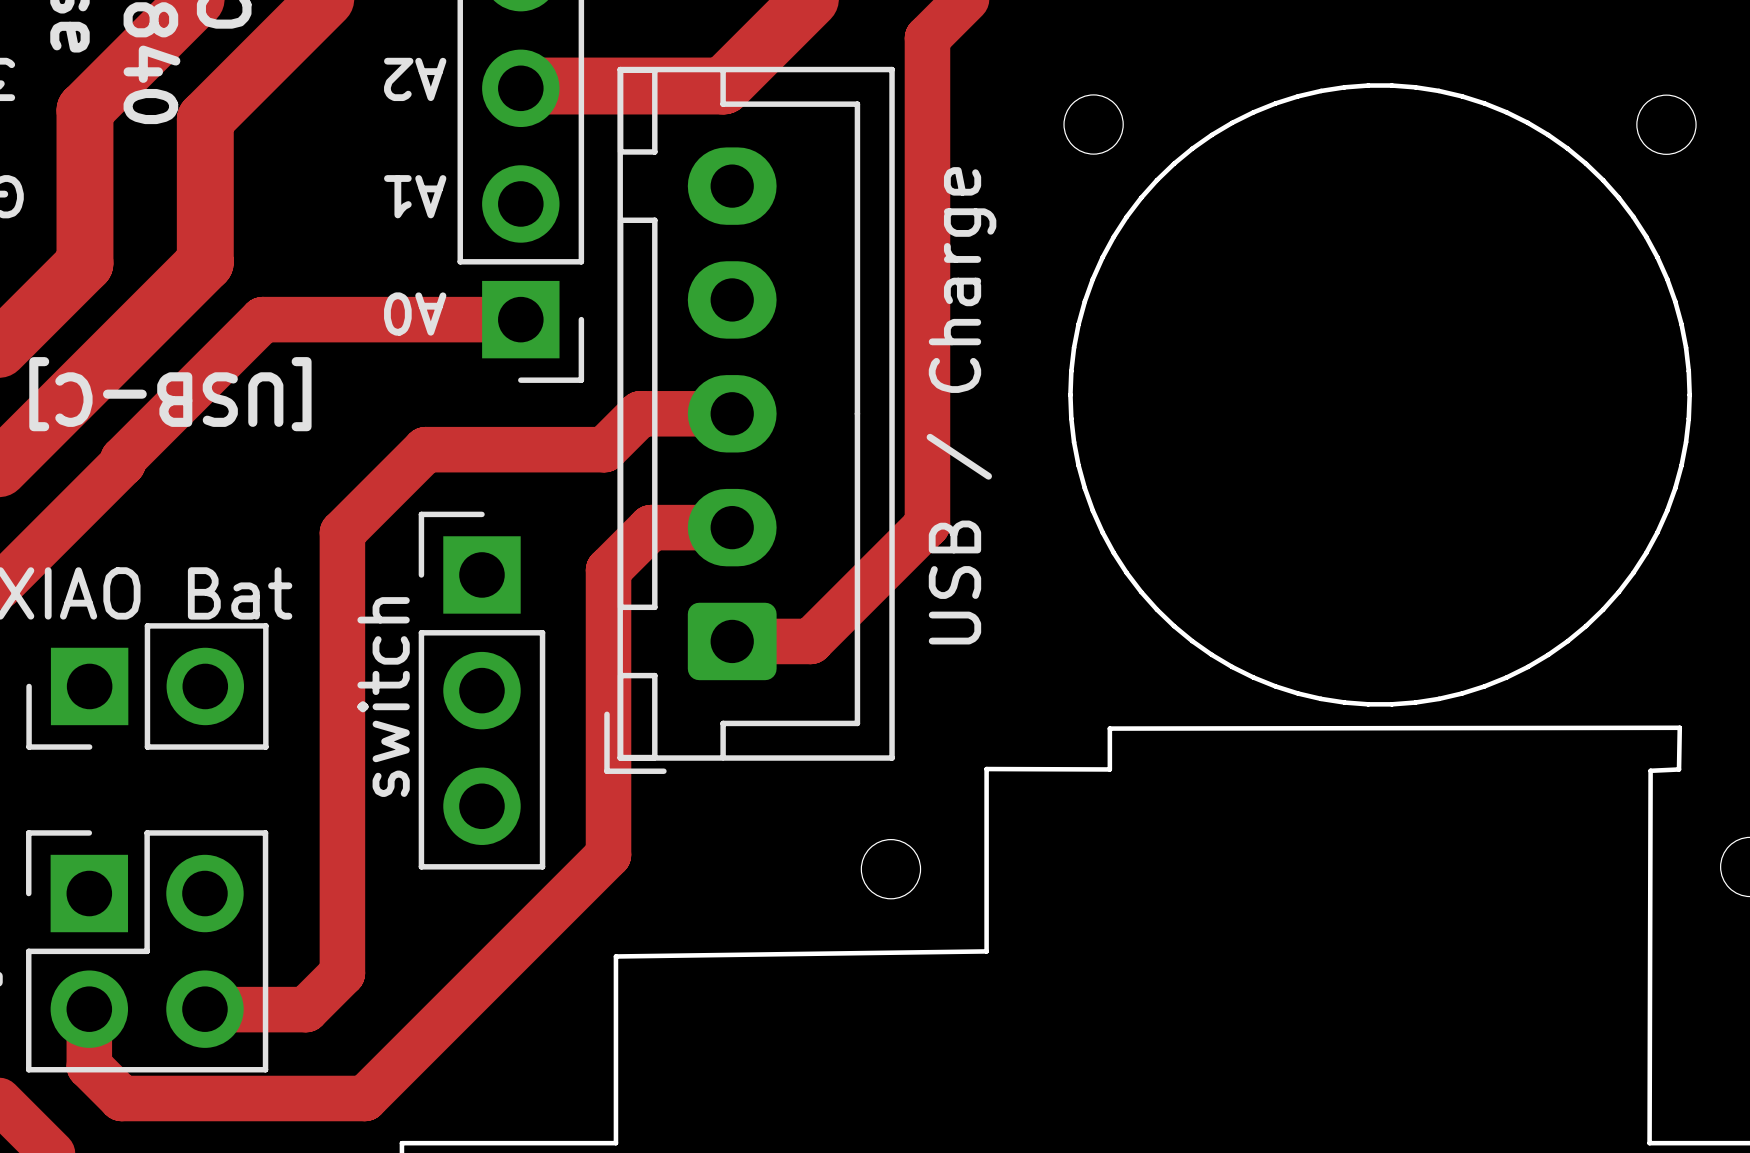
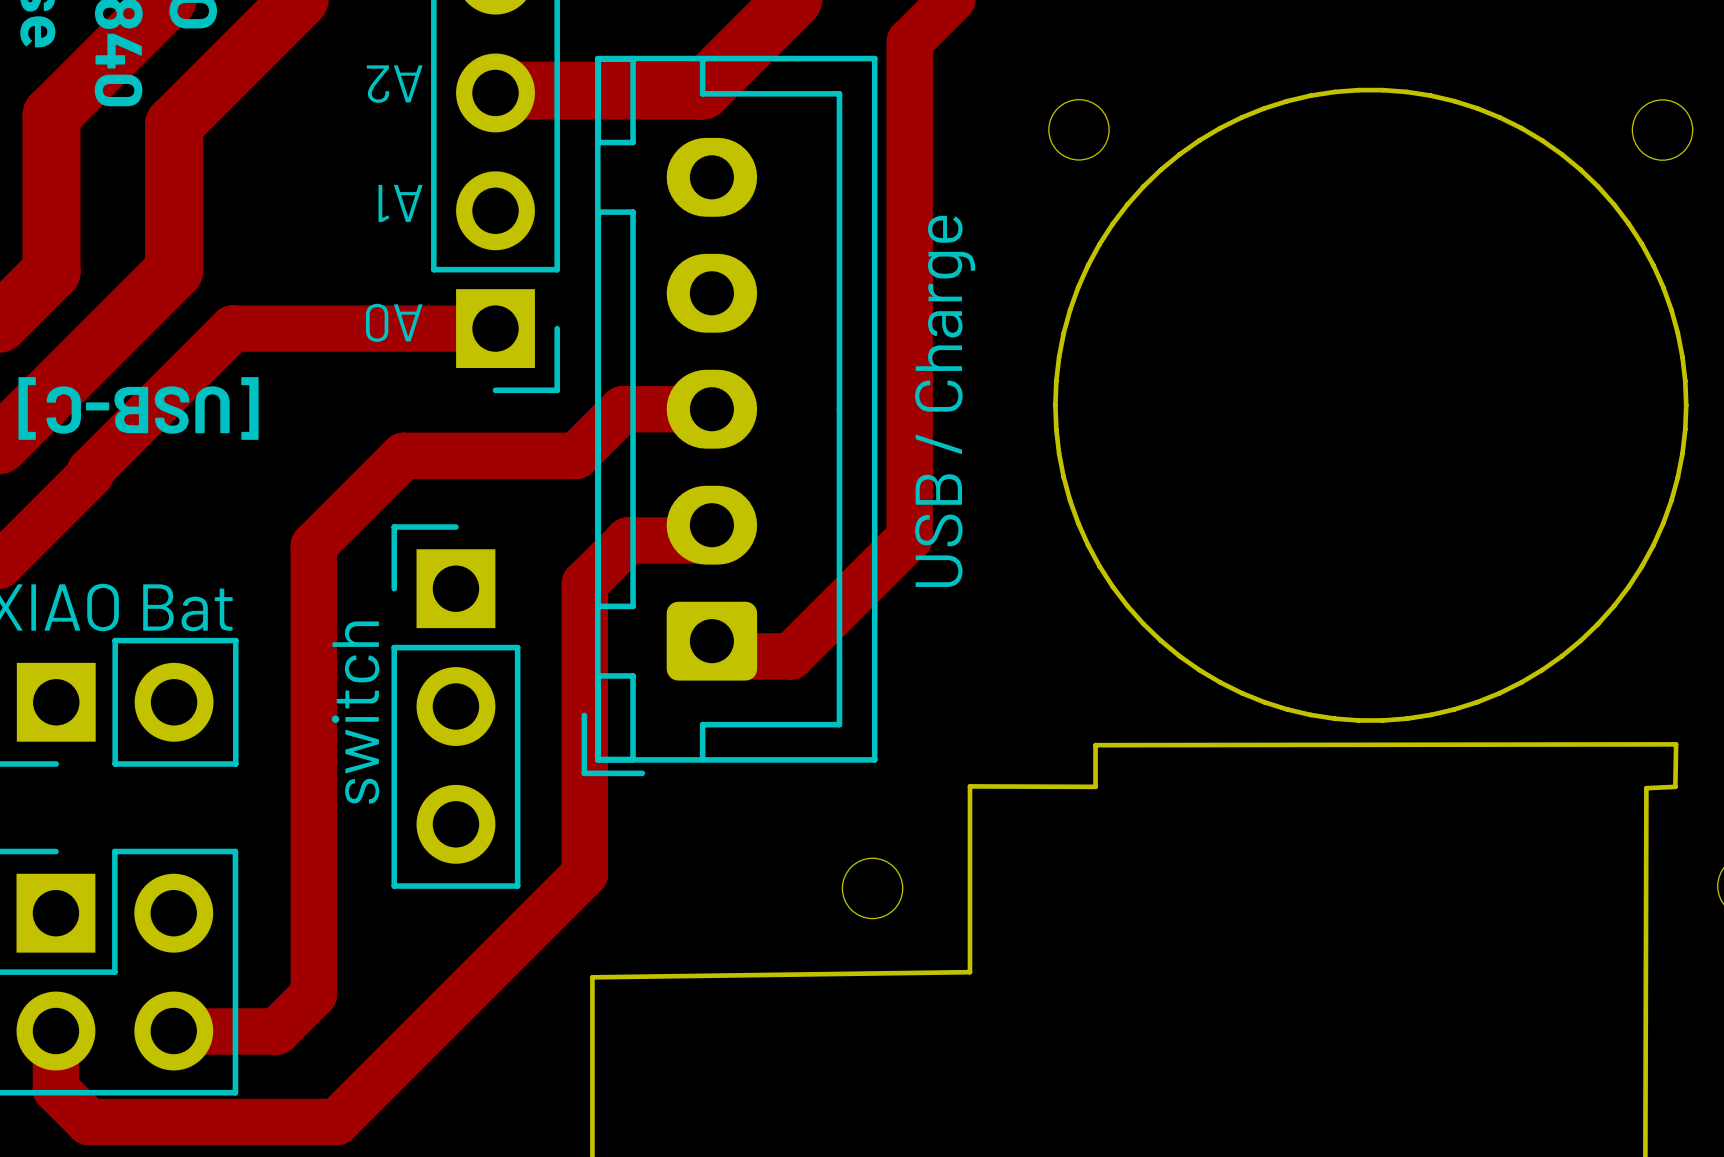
track: (732, 413) (640, 413) (604, 449) (425, 449) -> (711, 409) (622, 409) (576, 455) (403, 455) (398, 461)
USB / Charge position: (749, 420) -> (729, 415)

